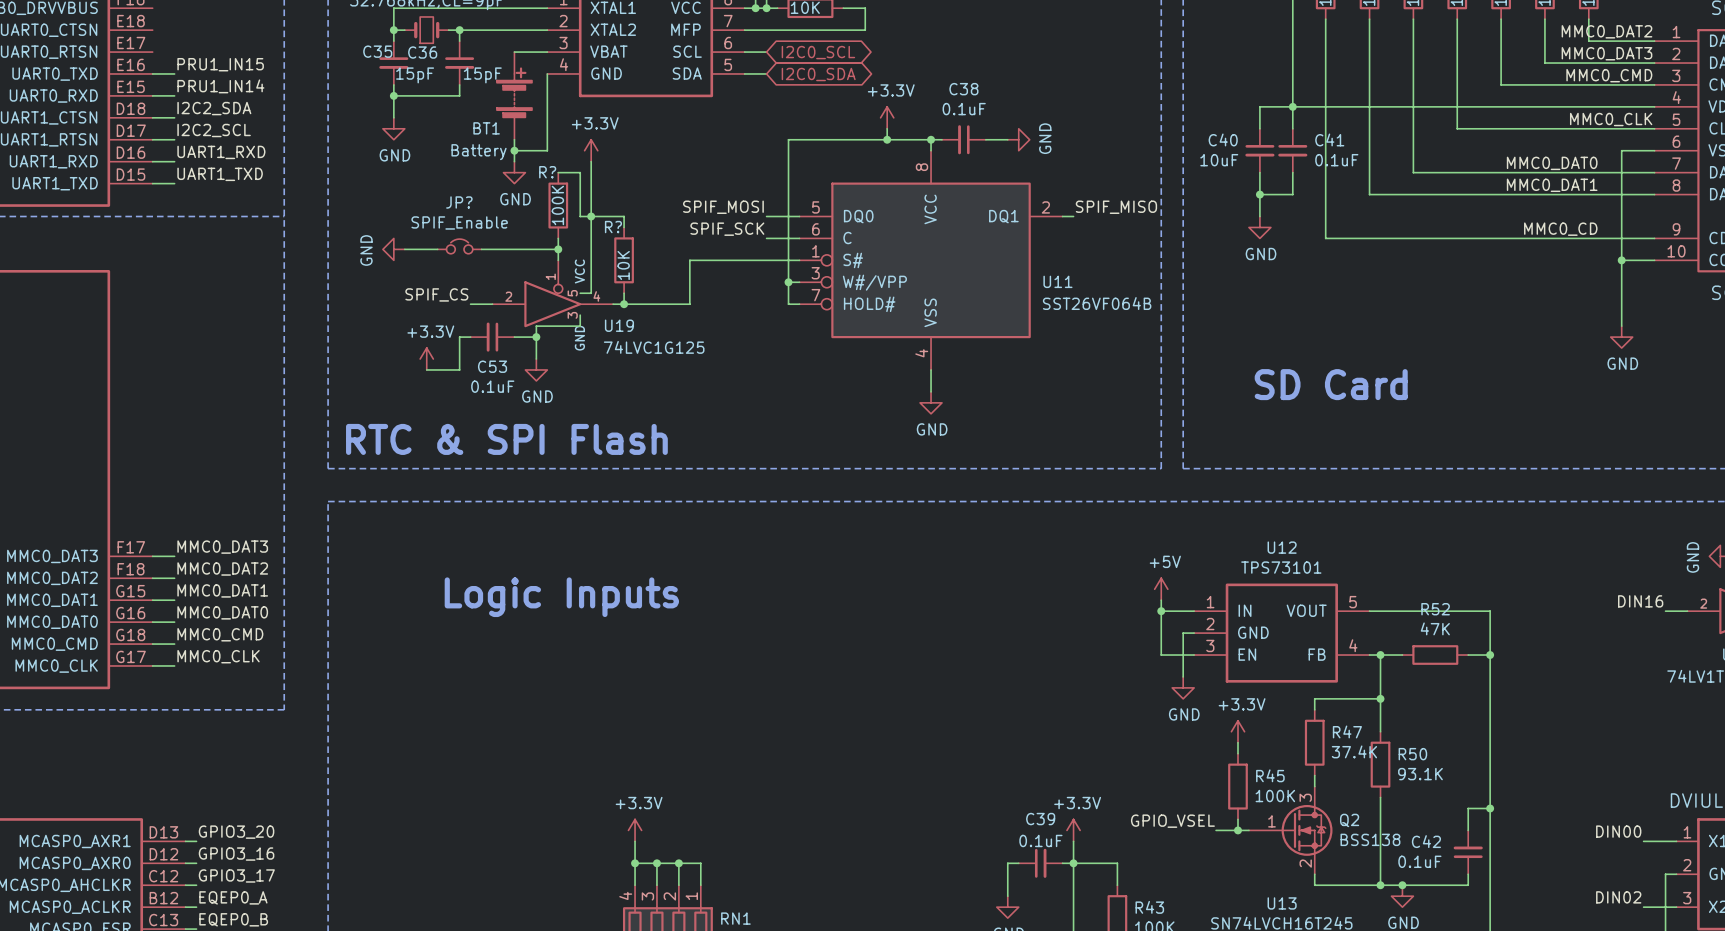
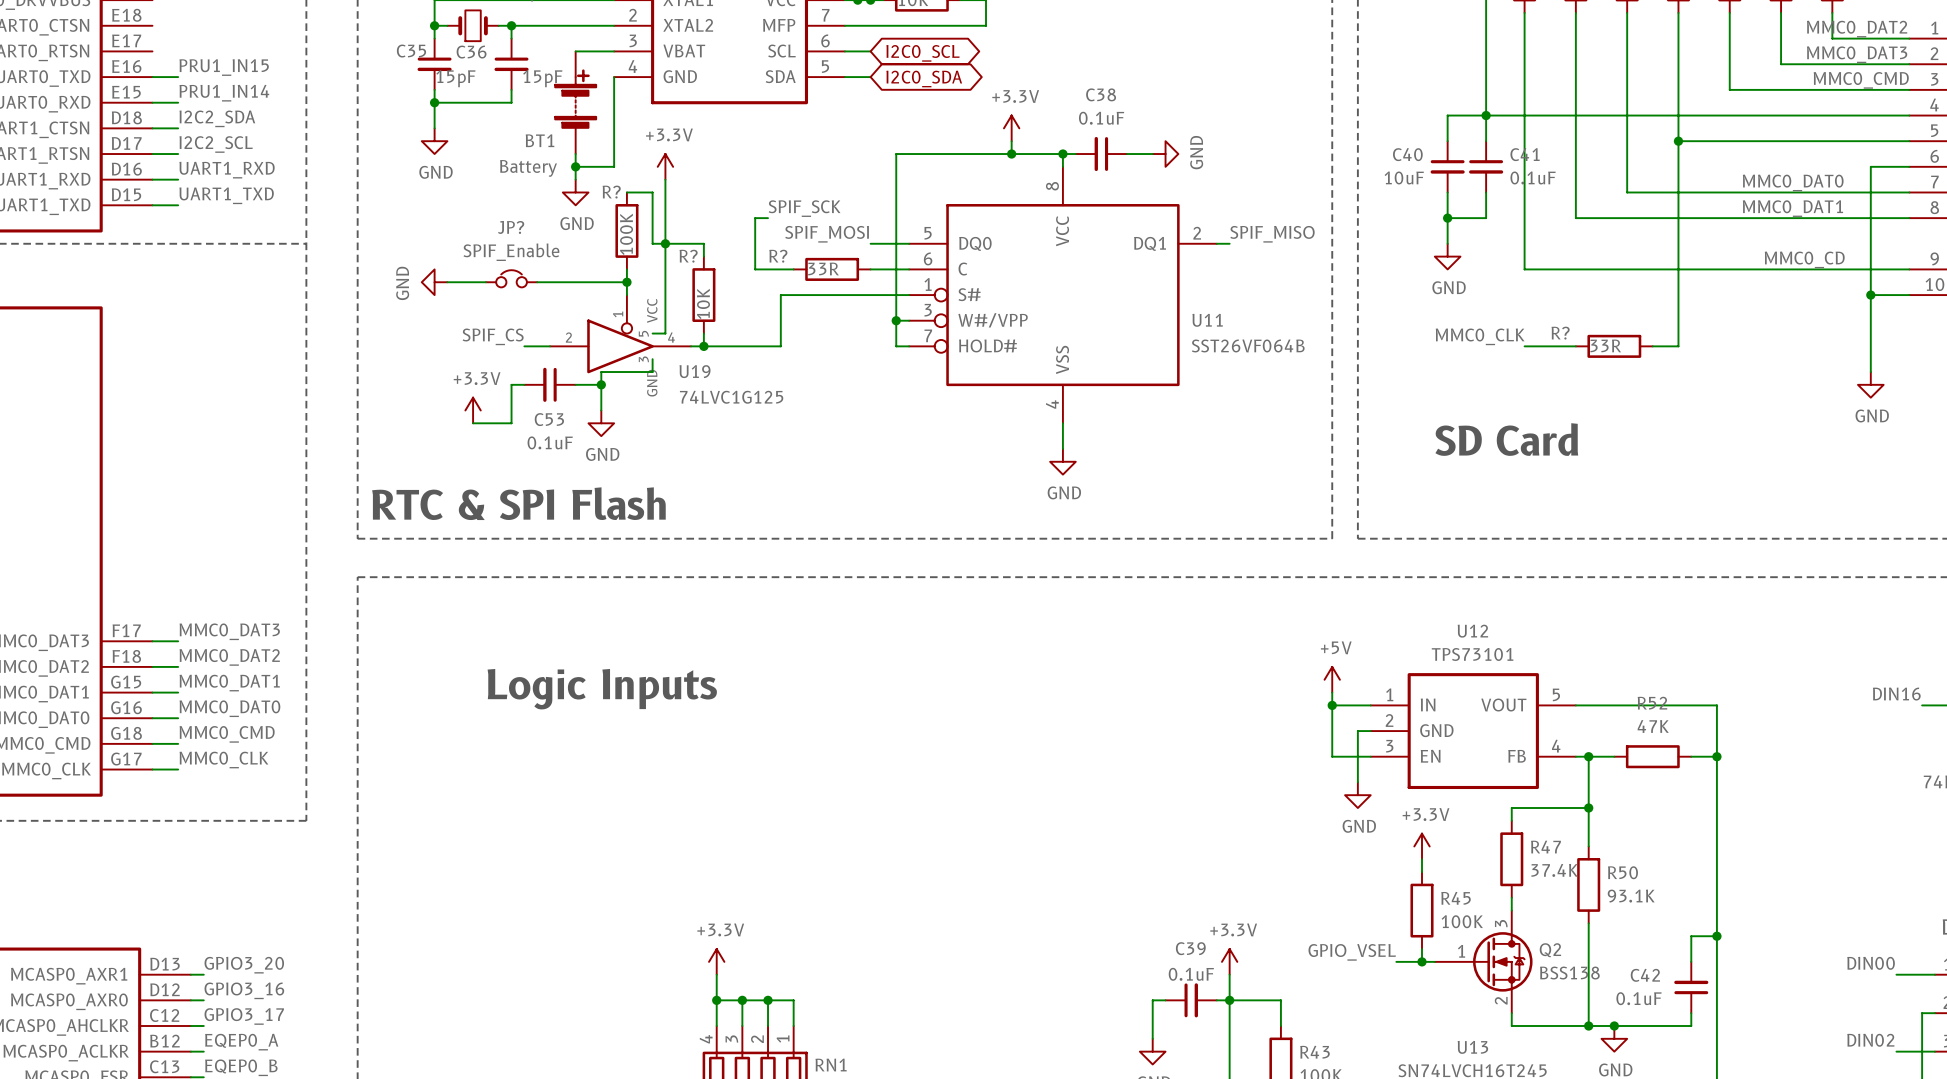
label: MMC0_CLK (1611, 119) -> none
wire: none -> (1678, 141) (1678, 346) (1652, 346)
junction: none -> (1678, 141)
wire: none -> (768, 218) (755, 218) (755, 269) (793, 269)
label position: SPIF_SCK (727, 229) -> SPIF_SCK (804, 208)
R?: none -> 33R (832, 269)
label: none -> MMC0_CLK (1480, 336)
wire: none -> (1524, 346) (1575, 346)
R?: none -> 33R (1614, 346)

